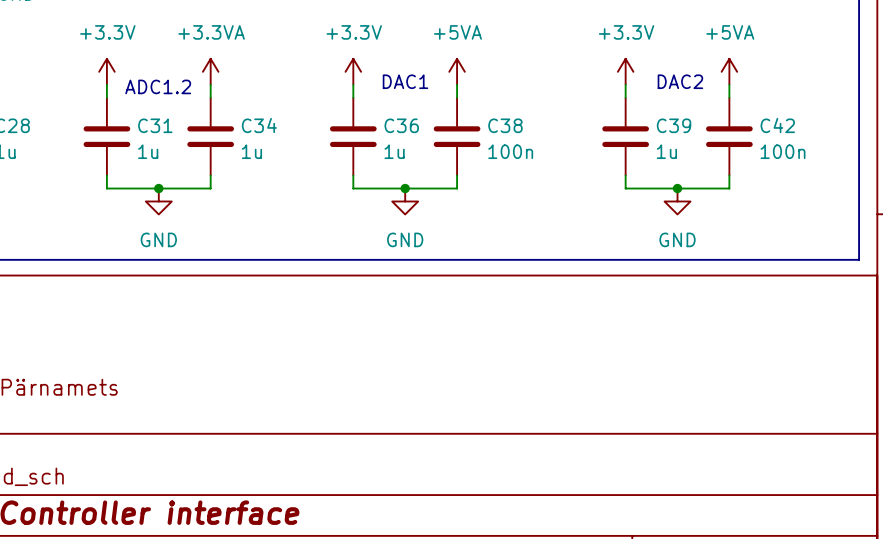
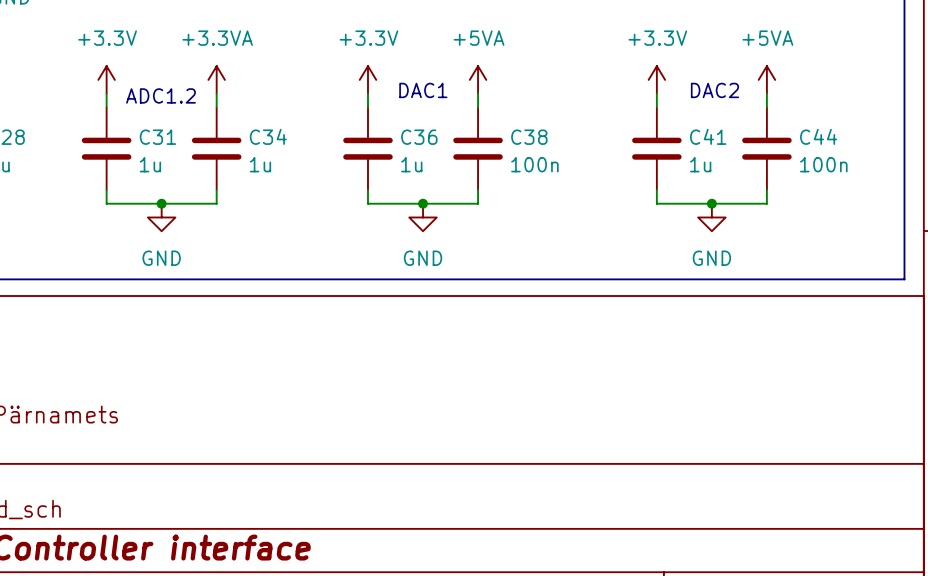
C39 name: C39 (674, 125) -> C41 (708, 136)
C42 name: C42 (777, 125) -> C44 (818, 136)

